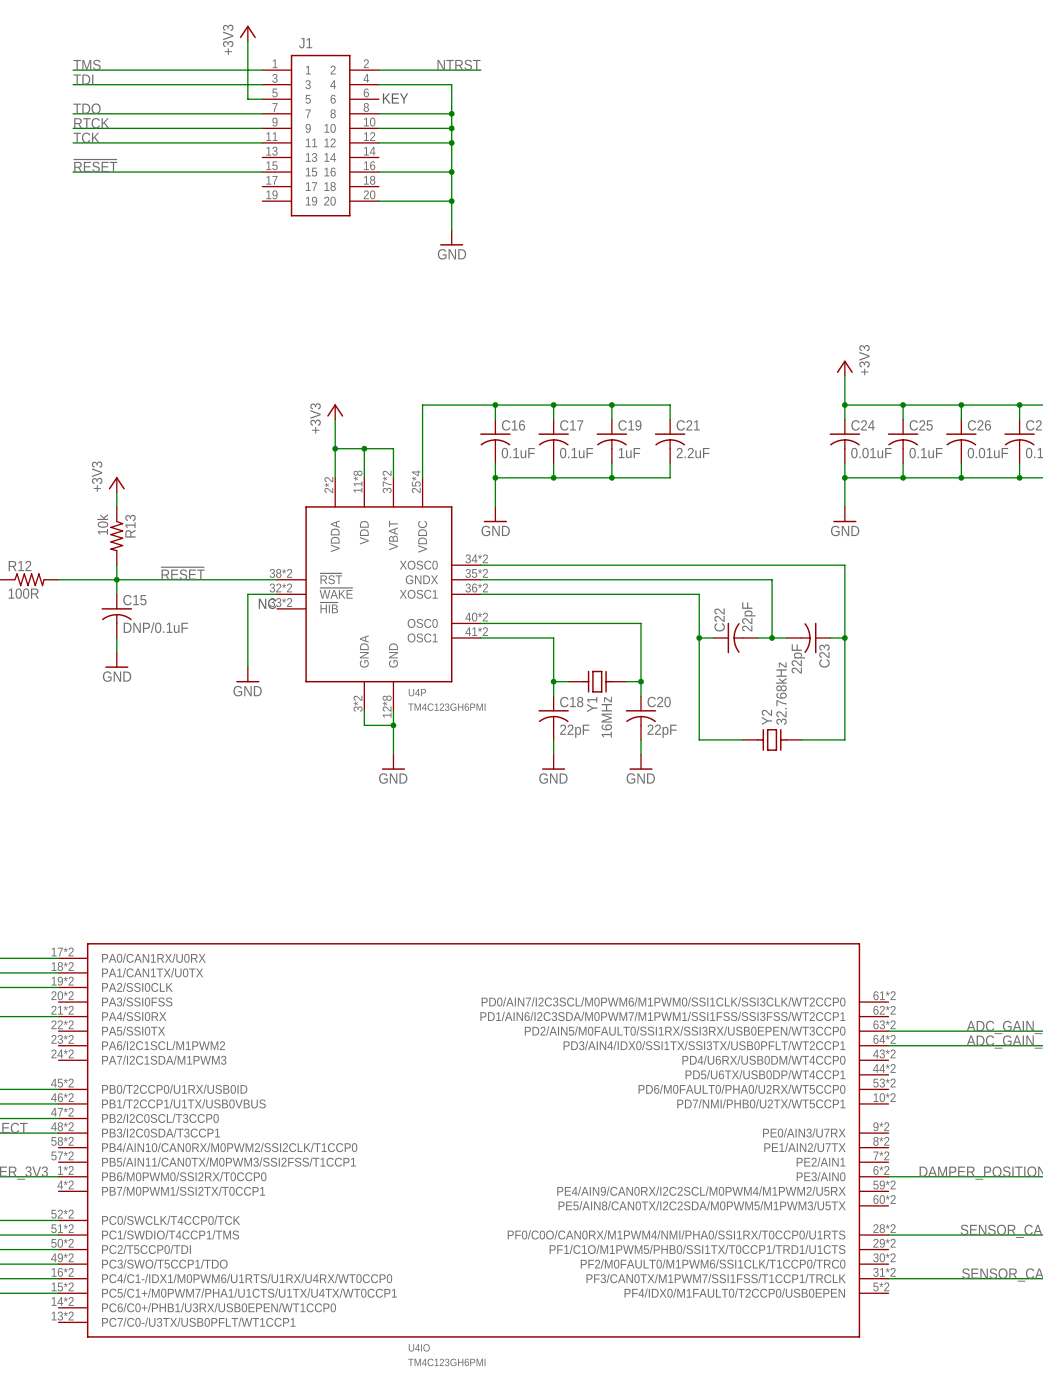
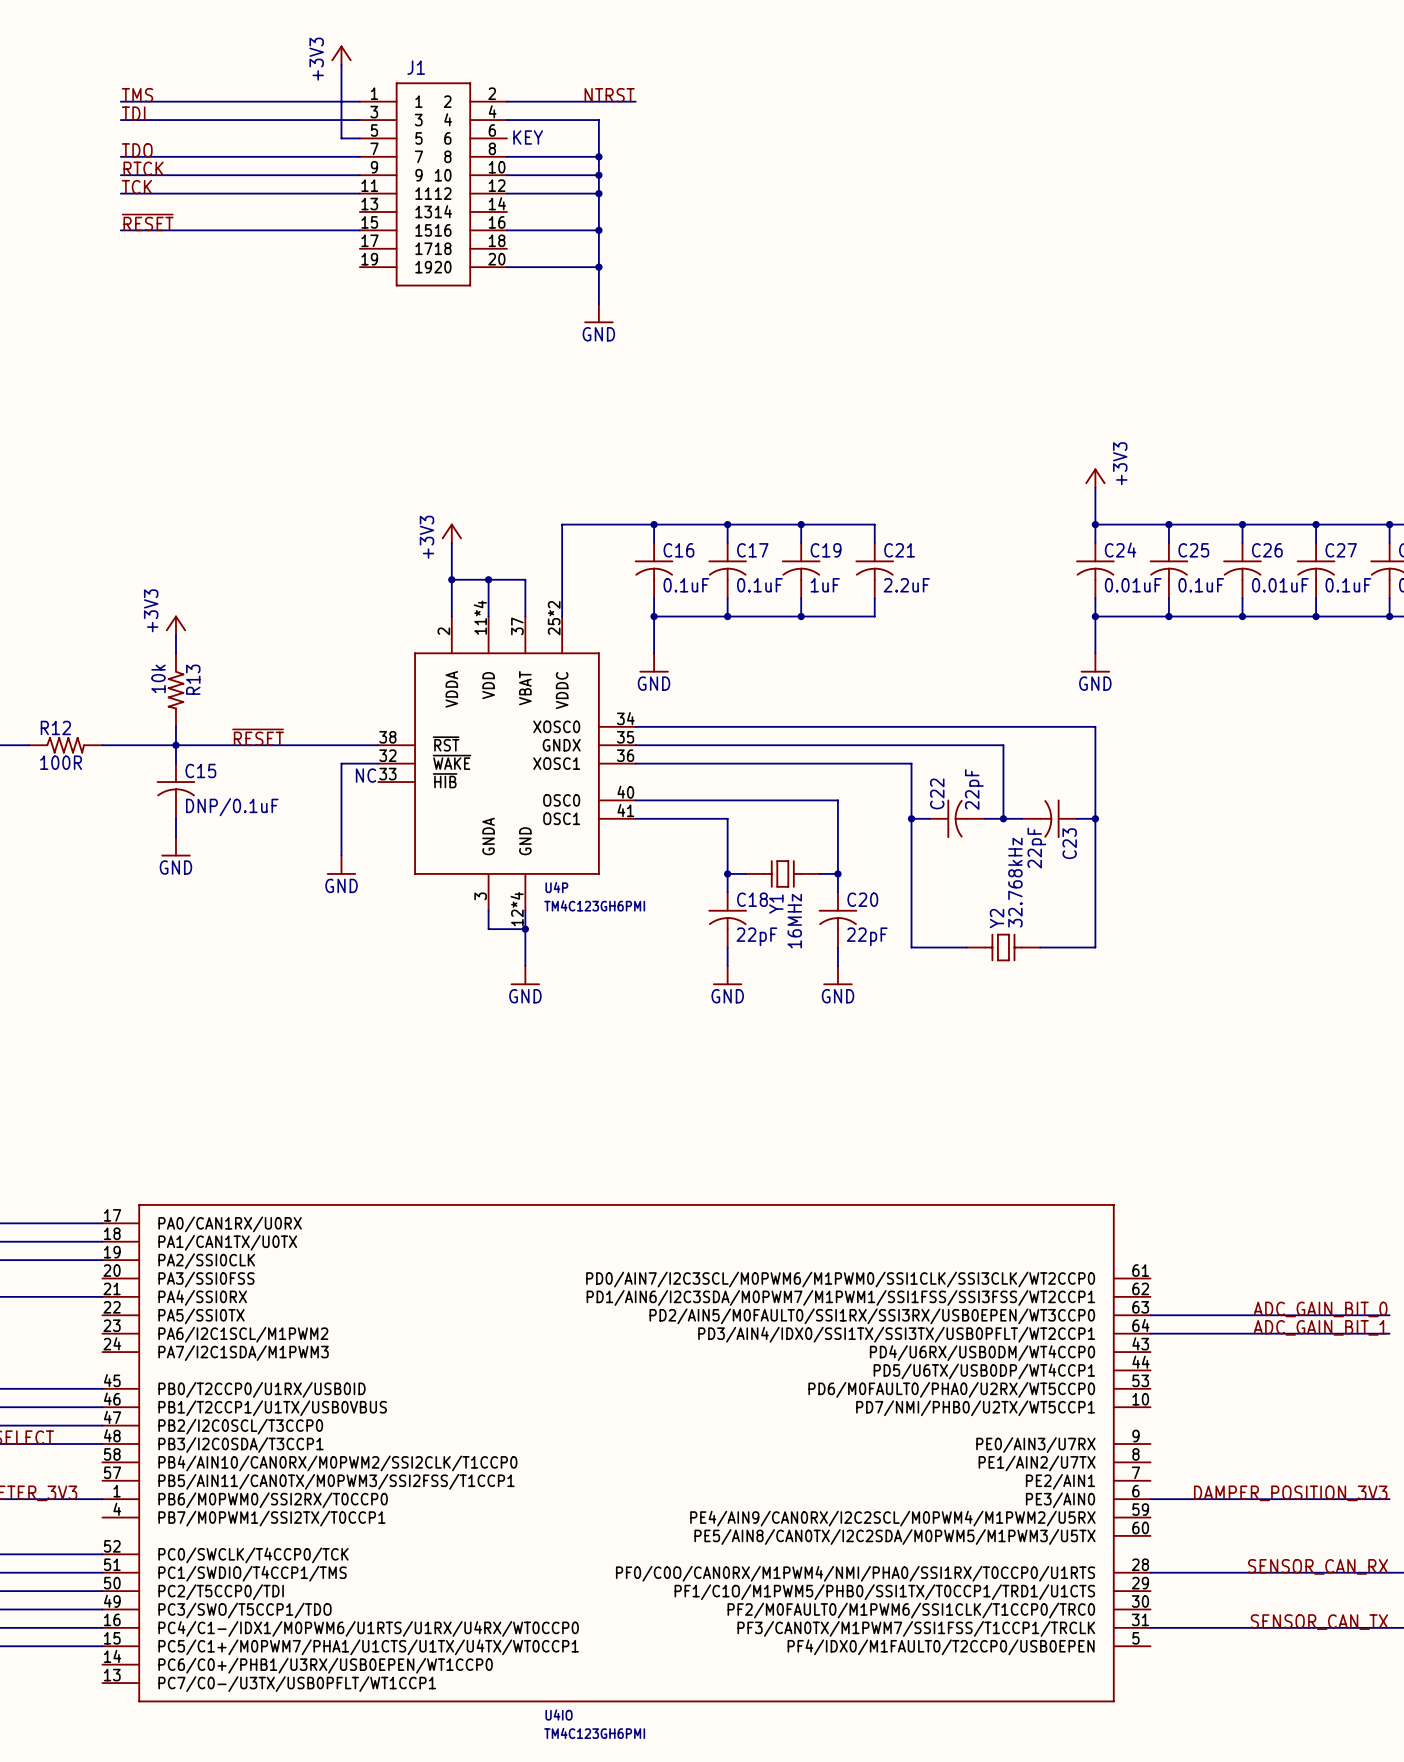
U4P symbol: [276, 477, 481, 711] -> [378, 616, 636, 911]
U4IO symbol: [58, 943, 889, 1338] -> [102, 1204, 1151, 1703]

